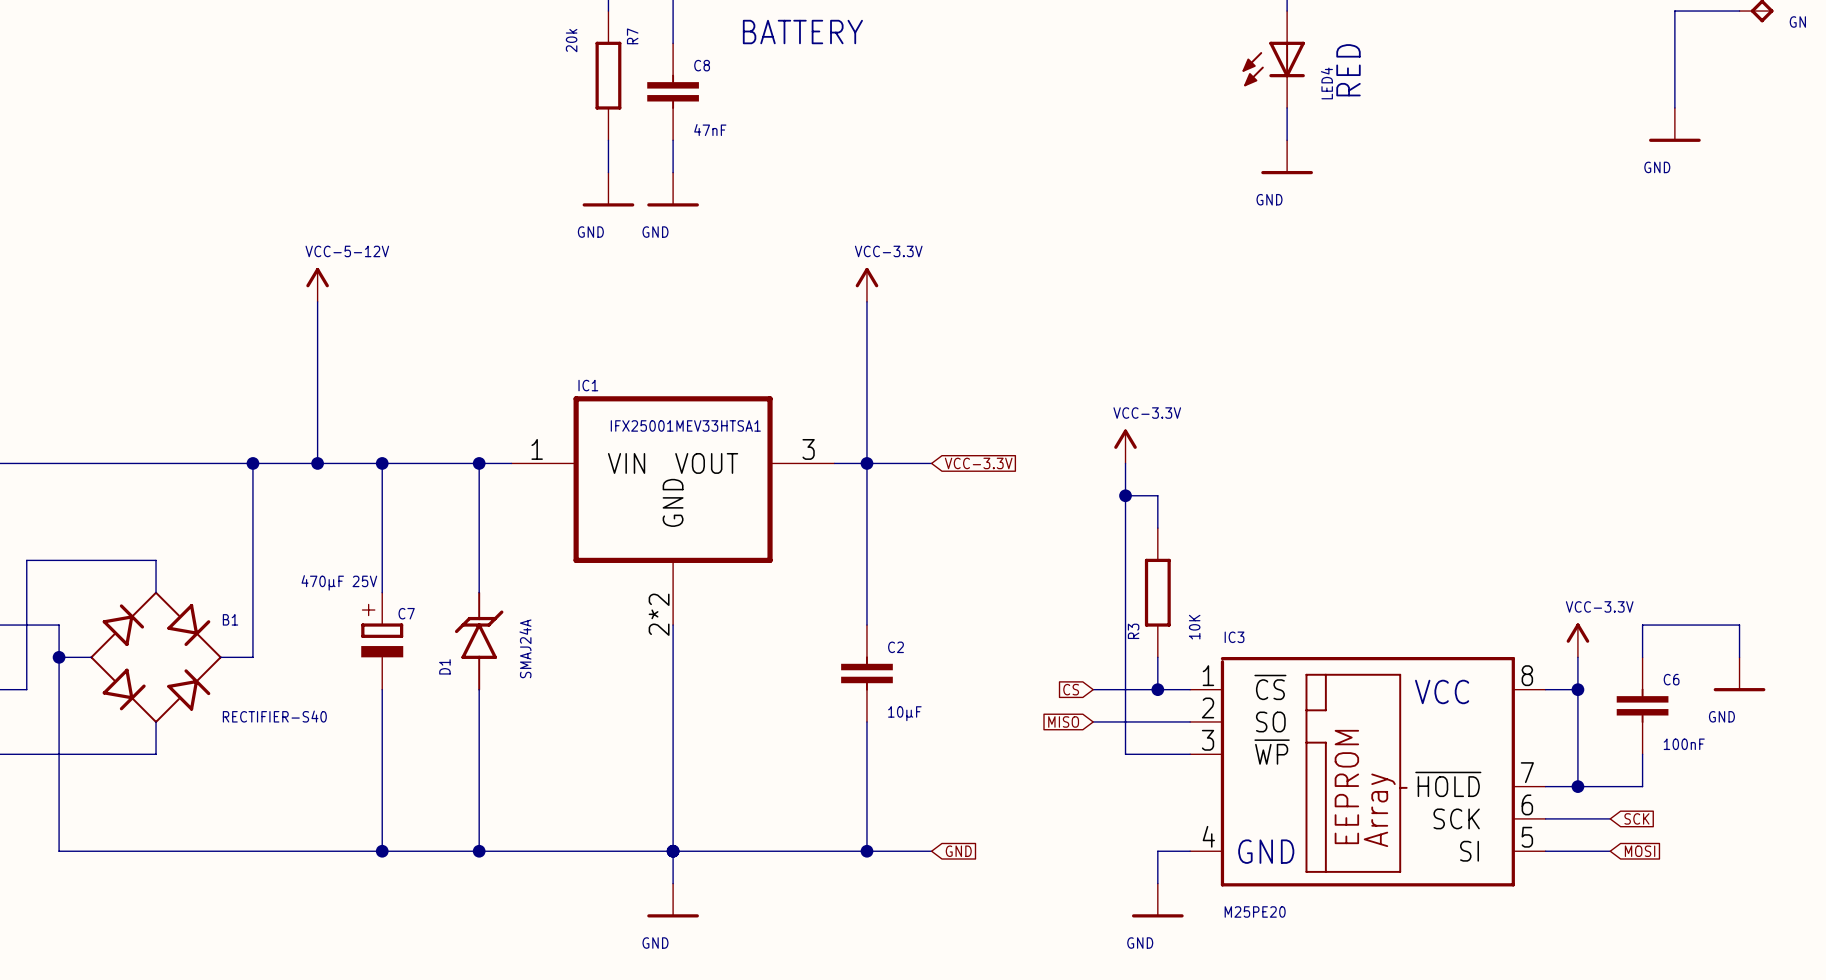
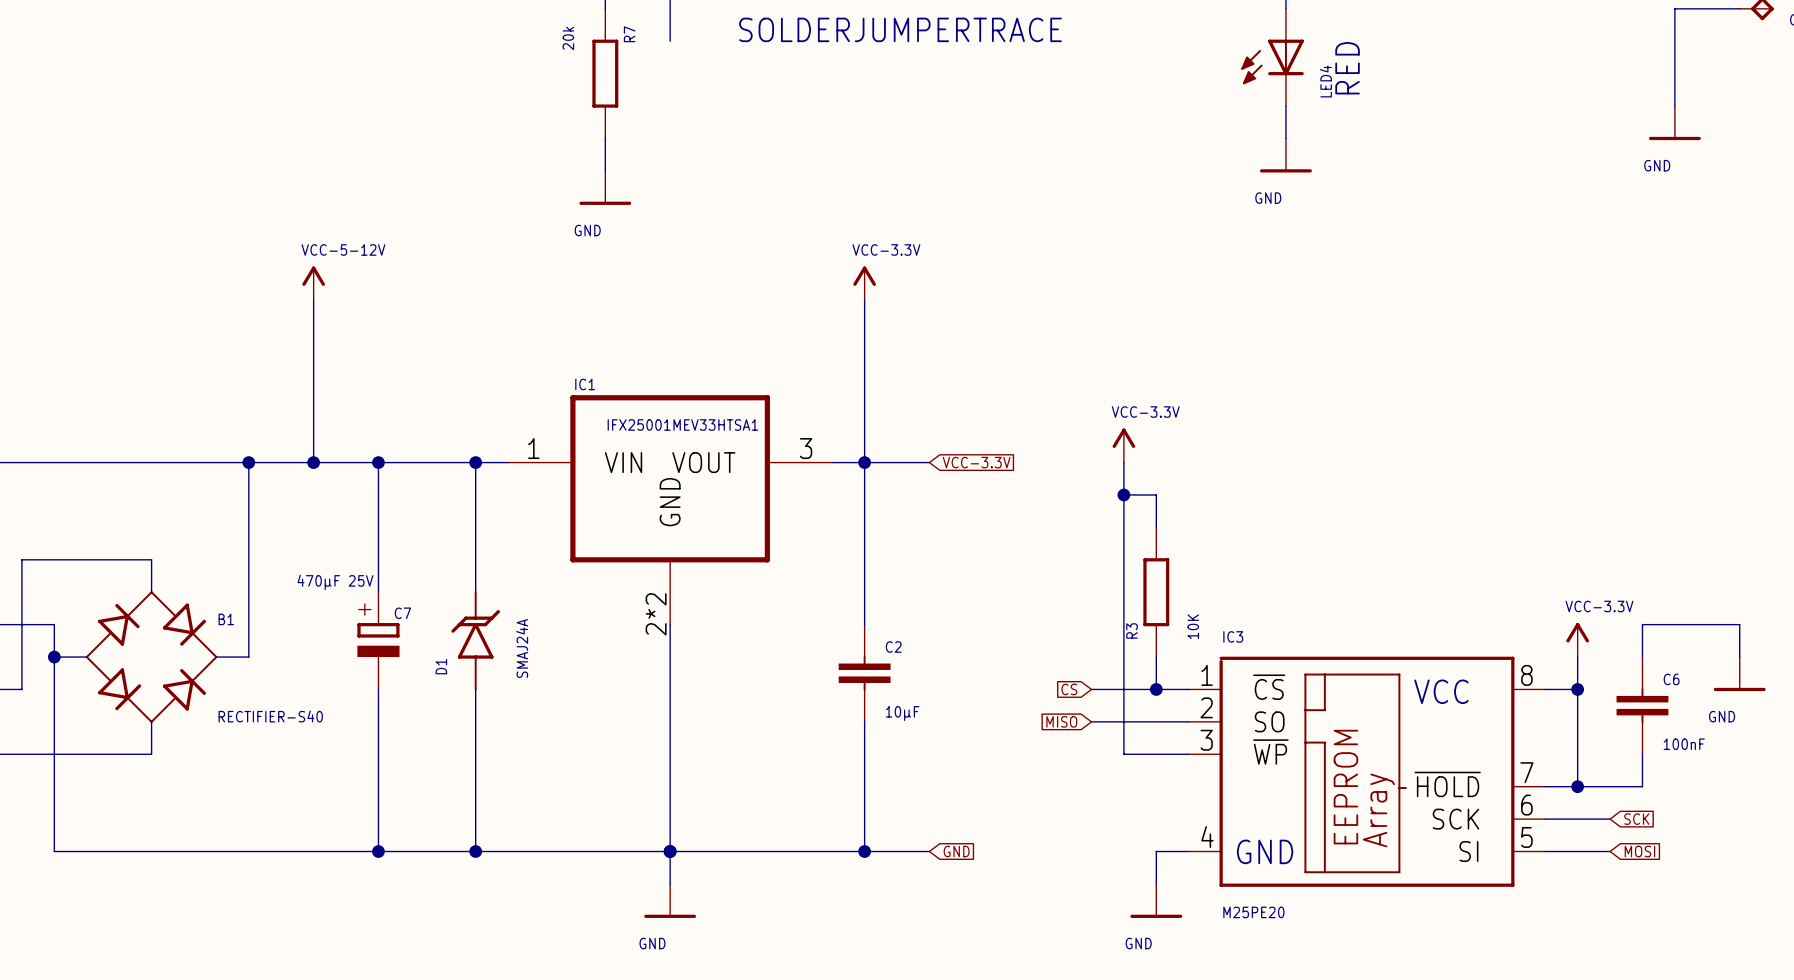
part value: BATTERY (802, 32) -> SOLDERJUMPERTRACE (900, 29)
C8: 47nF (673, 91) -> none
wire: (673, 140) (673, 172) -> none
power symbol: GND (673, 189) -> none

